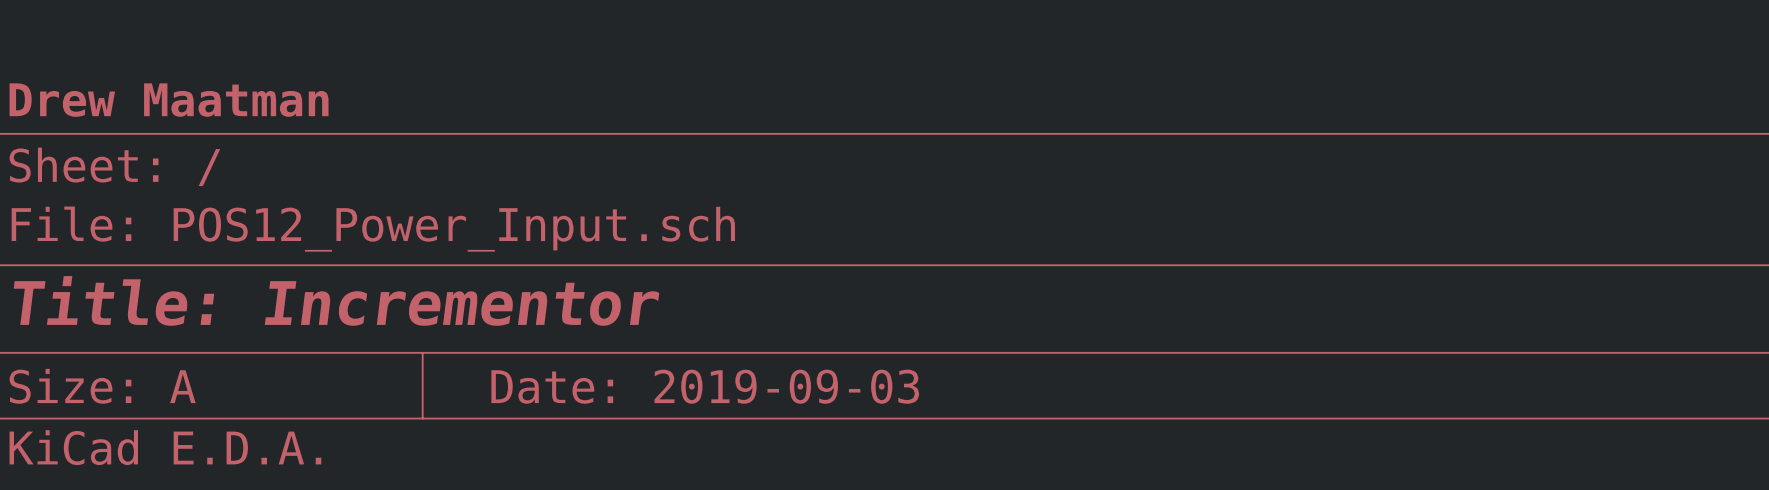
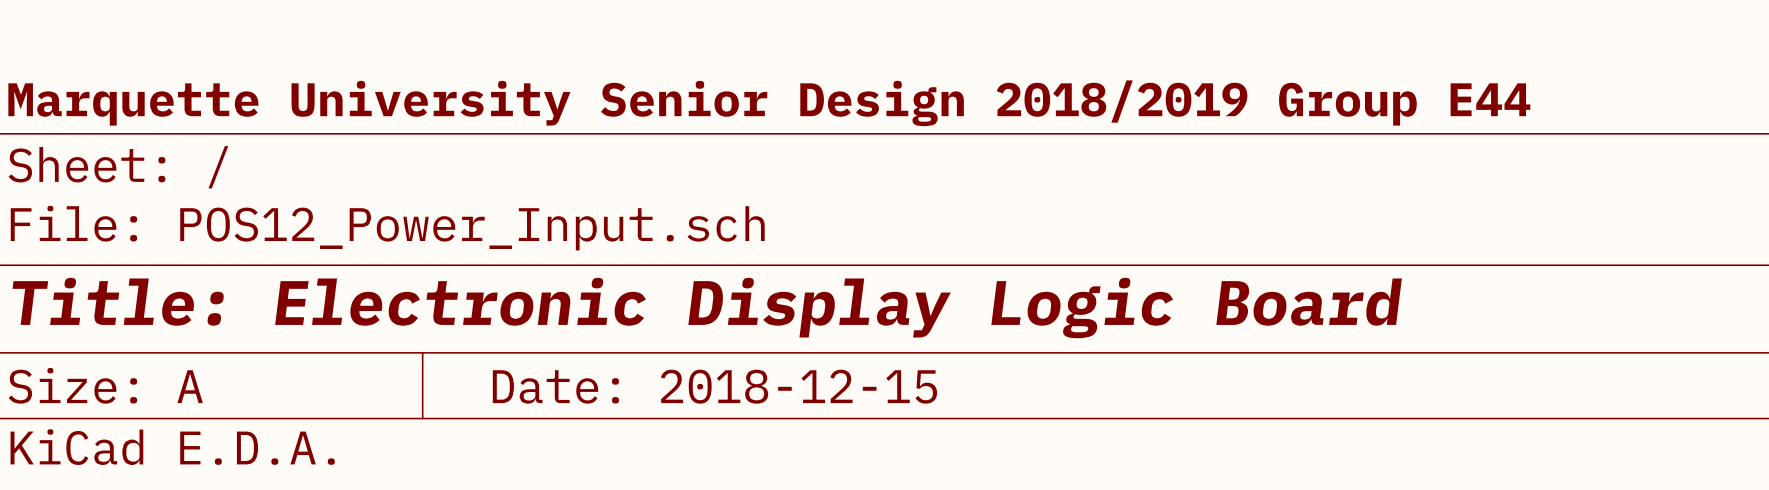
title block: Drew Maatman (169, 100) -> Marquette University Senior Design 2018/2019 Group E44 (769, 103)
title block: Title: Incrementor (336, 300) -> Title: Electronic Display Logic Board (707, 308)
title block: Date: 2019-09-03 (705, 386) -> Date: 2018-12-15 (714, 386)

